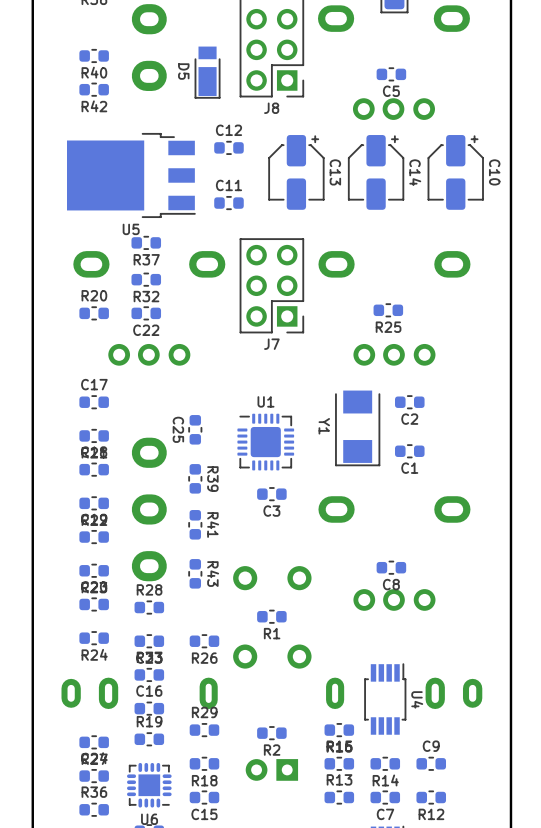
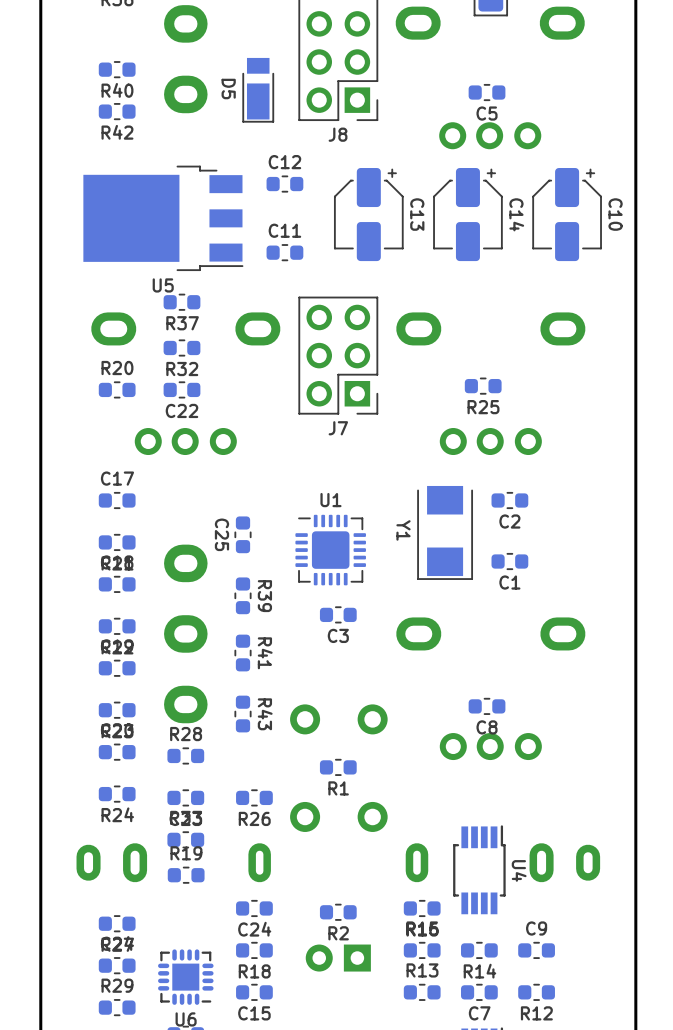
C16: (149, 708) -> none
R29 name: R29 (204, 712) -> C24 (254, 929)
R19 position: (149, 739) -> (186, 875)
R36 name: R36 (94, 792) -> R29 (117, 985)

